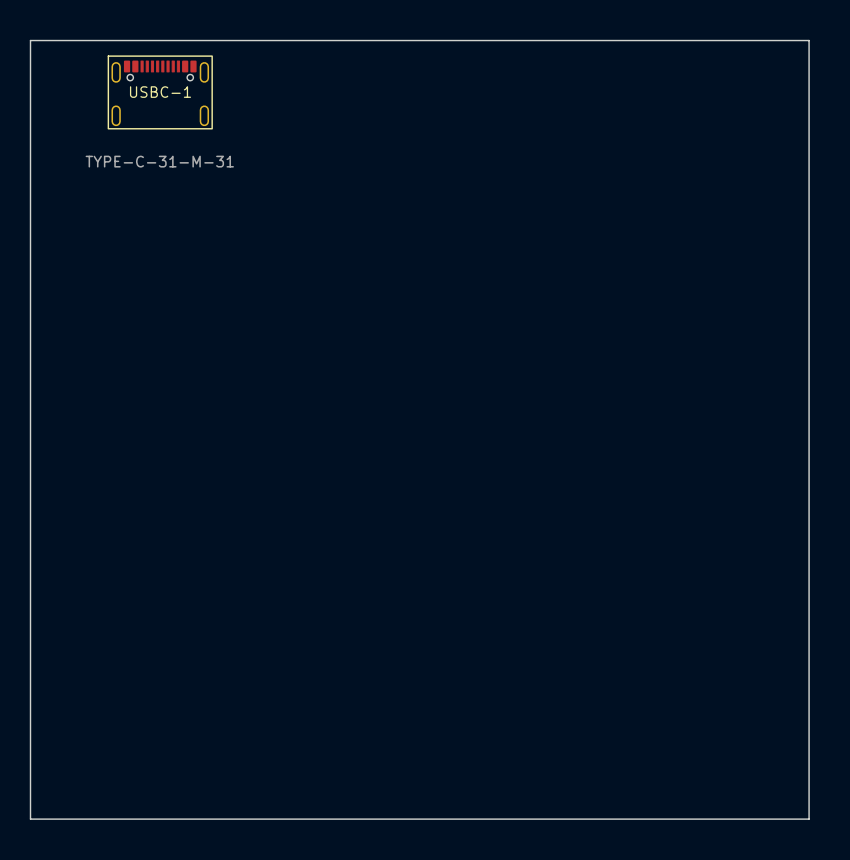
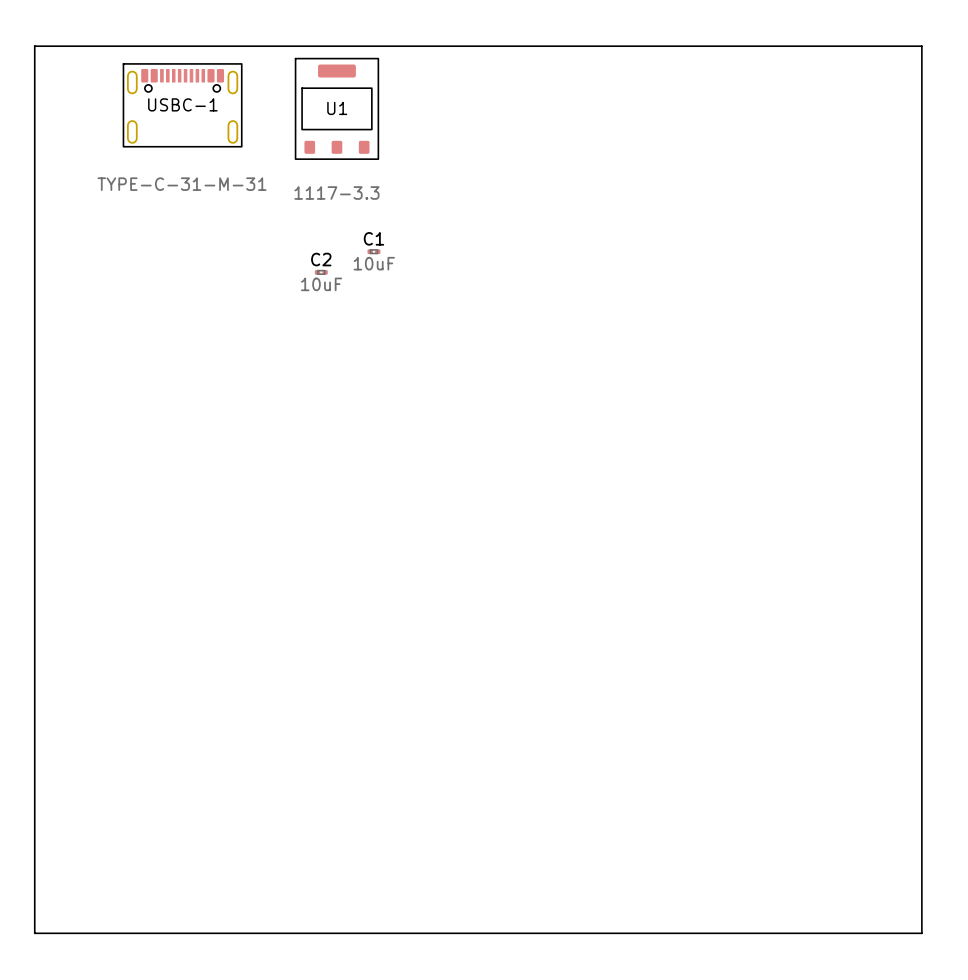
U1: none -> 1117-3.3 (336, 108)
C1: none -> 10uF (373, 251)
C2: none -> 10uF (321, 272)

